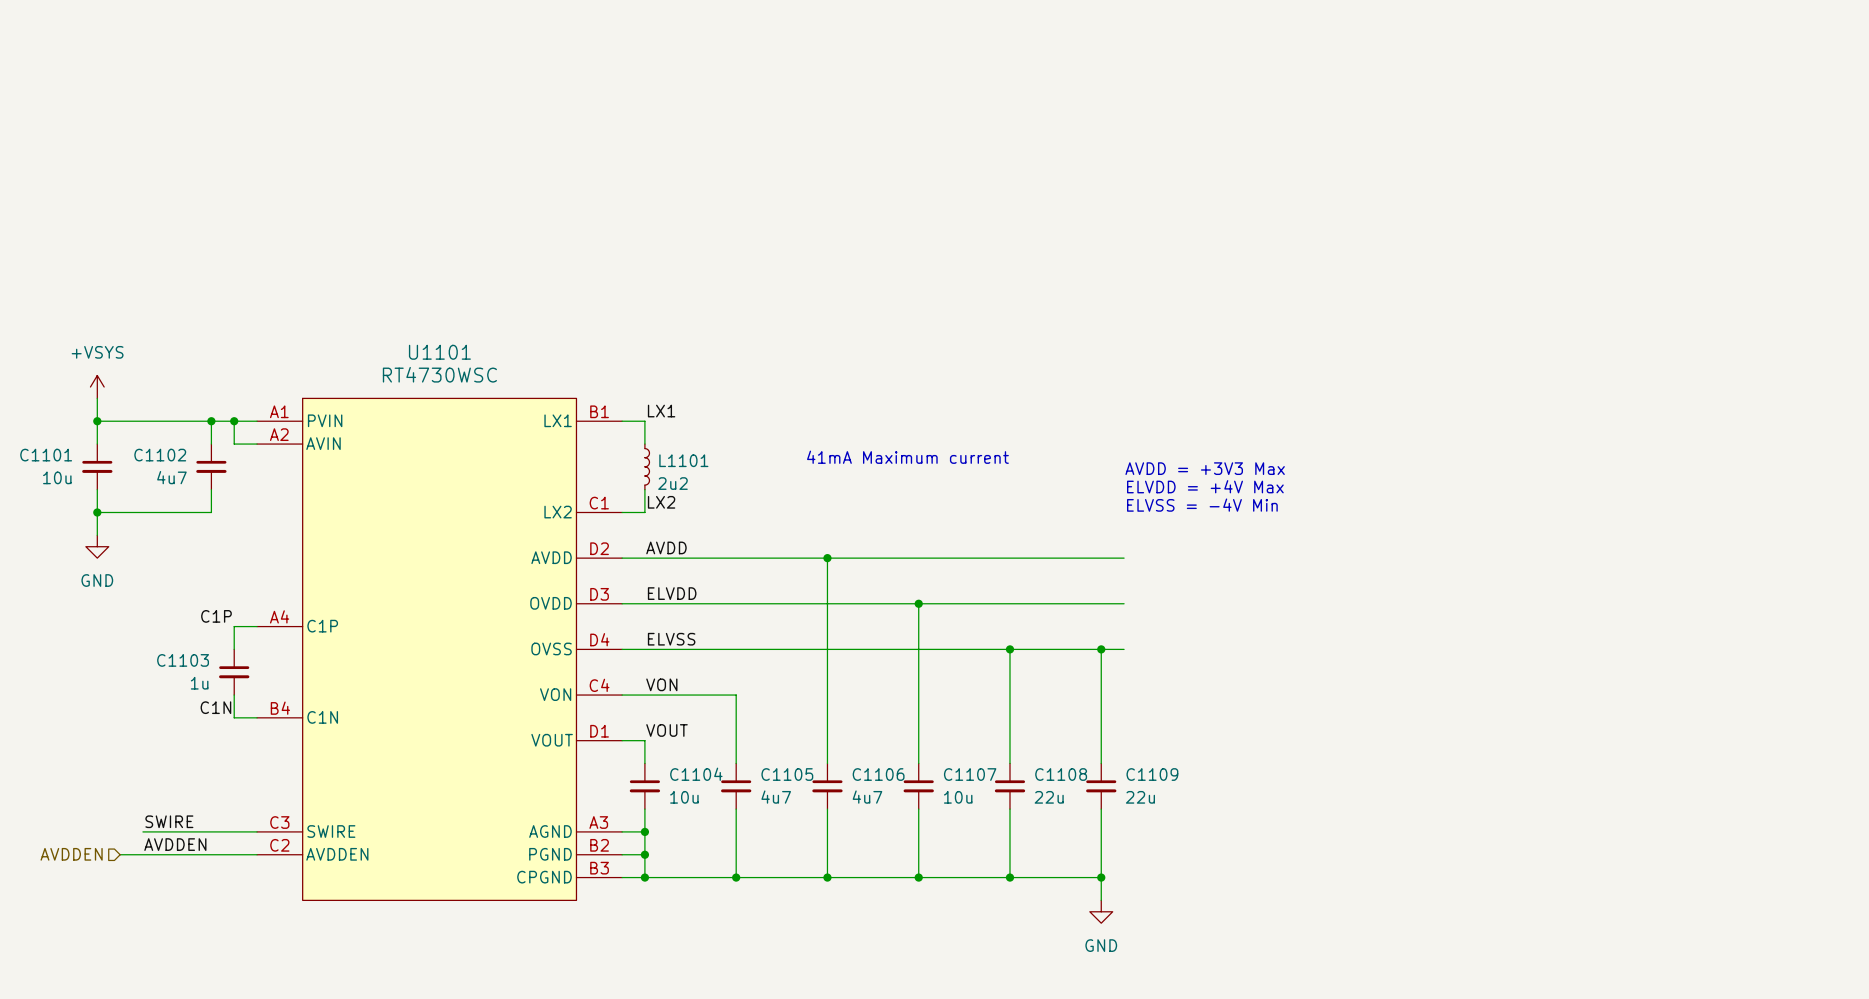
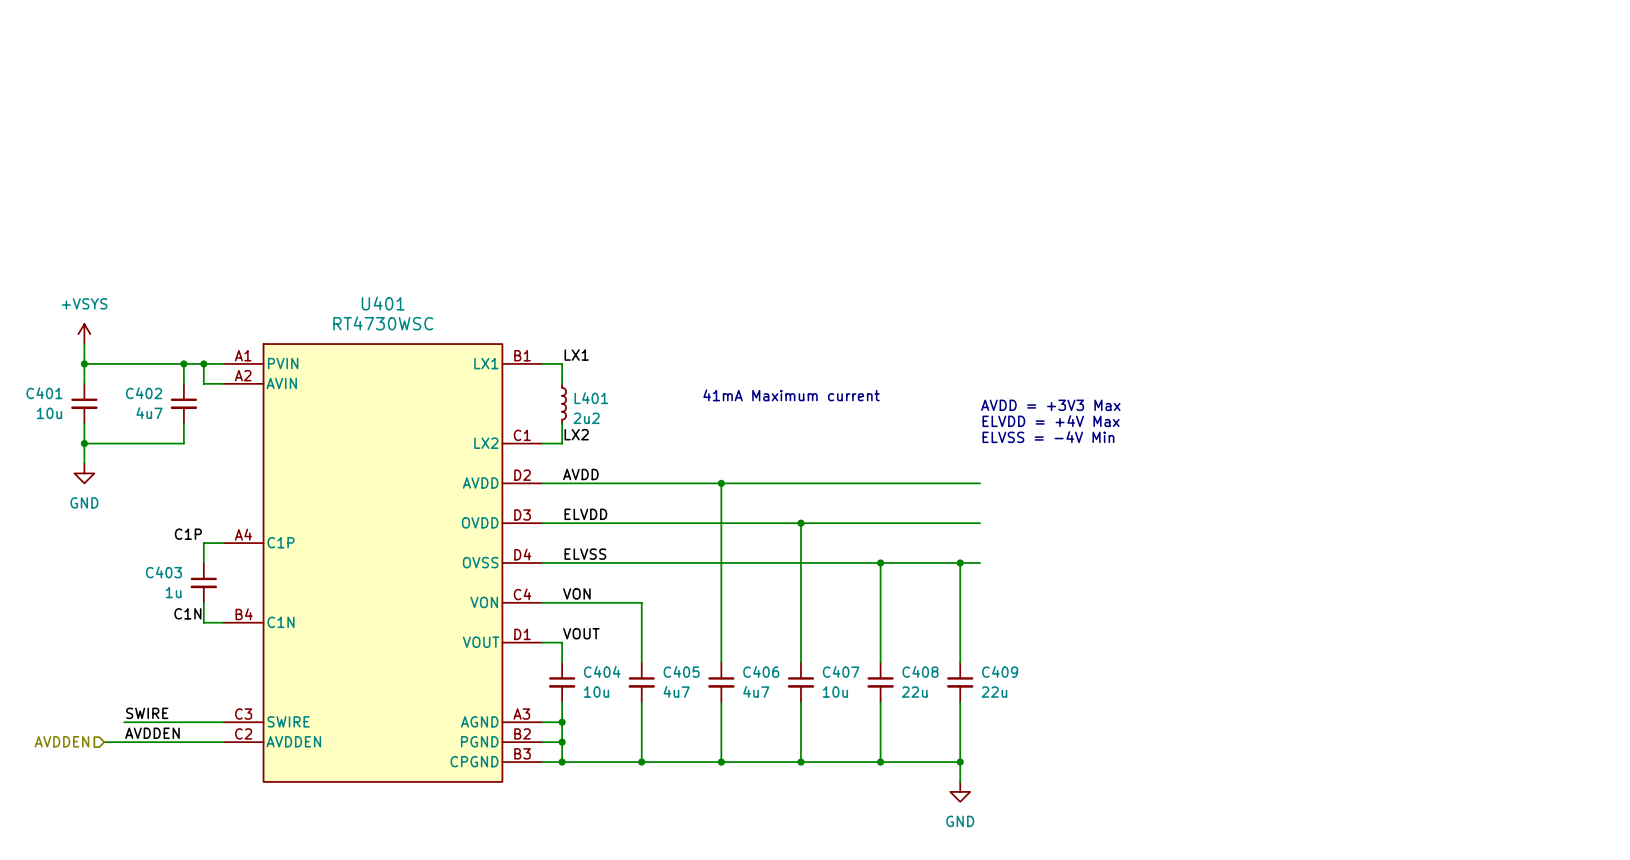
U1101 name: U1101 (439, 352) -> U401 (383, 303)
C1101 name: C1101 (46, 455) -> C401 (44, 393)
C1102 name: C1102 (160, 455) -> C402 (144, 393)
L1101 name: L1101 (683, 460) -> L401 (591, 398)
C1103 name: C1103 (183, 660) -> C403 (163, 572)
C1104 name: C1104 (696, 774) -> C404 (602, 671)
C1105 name: C1105 (787, 774) -> C405 (681, 671)
C1106 name: C1106 (878, 774) -> C406 (761, 671)
C1107 name: C1107 (970, 774) -> C407 (841, 671)
C1108 name: C1108 (1061, 774) -> C408 (920, 671)
C1109 name: C1109 (1152, 774) -> C409 (1000, 671)

